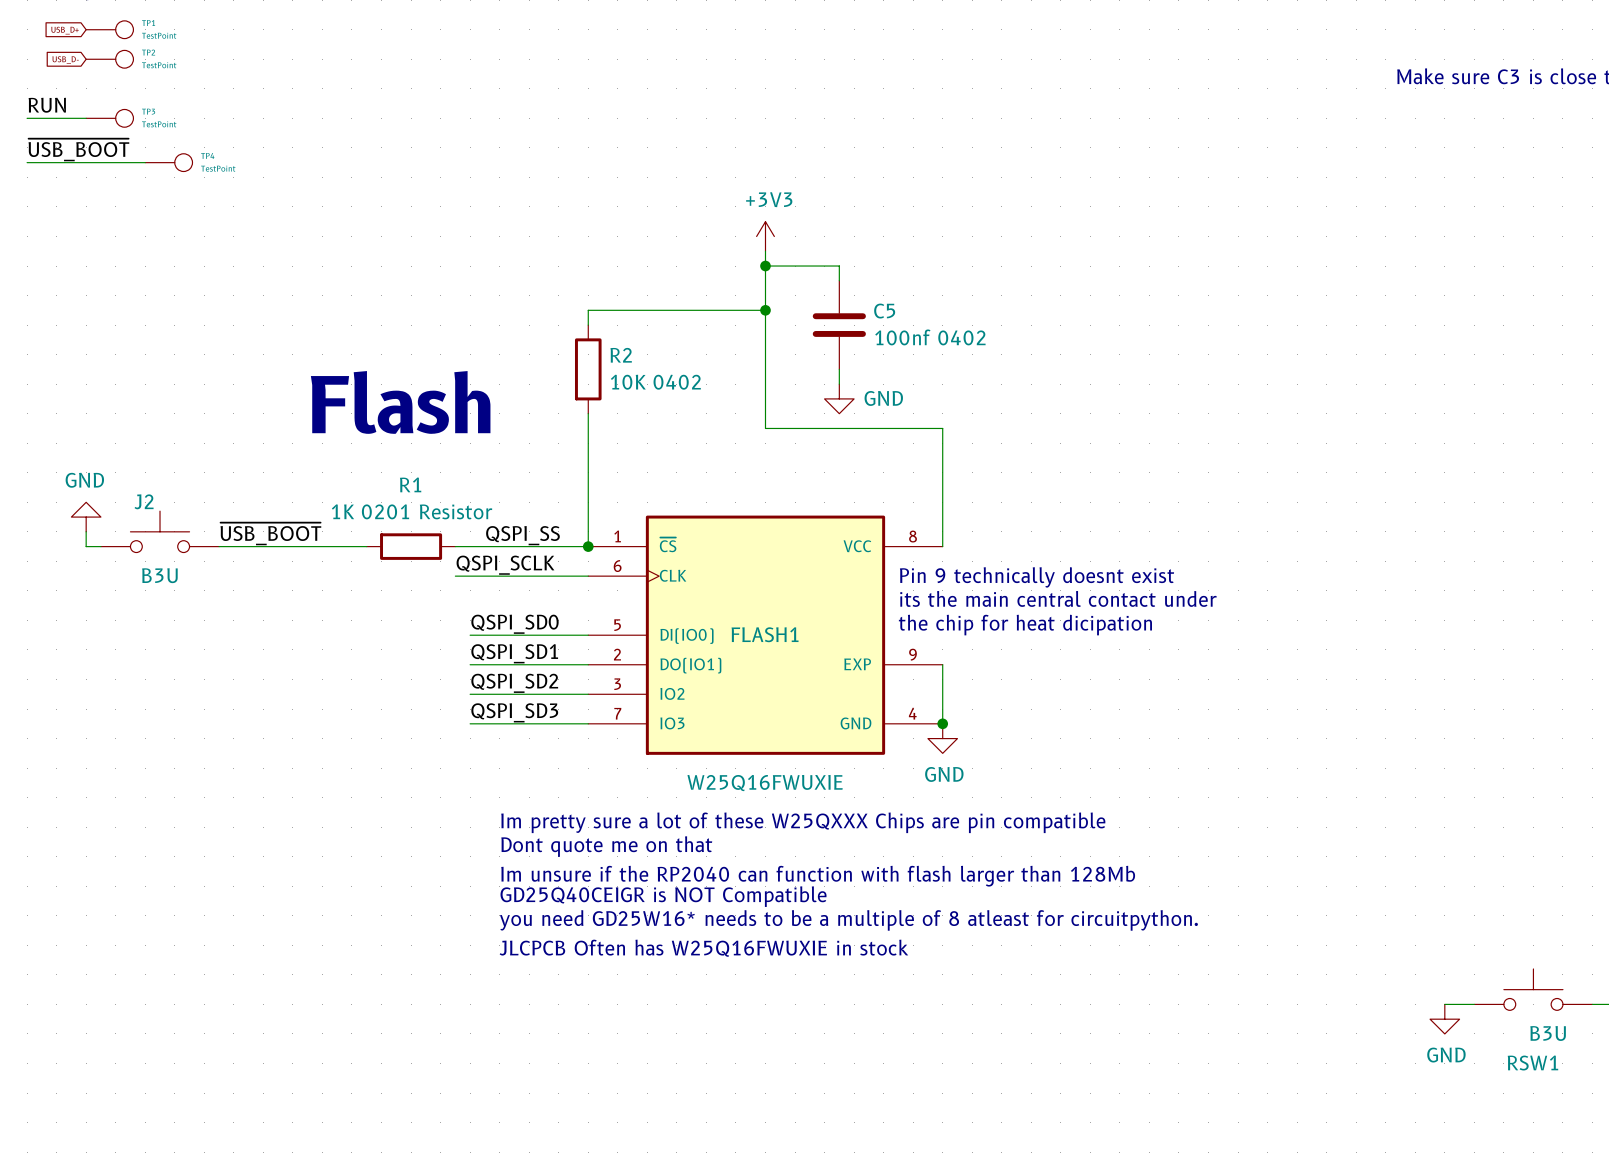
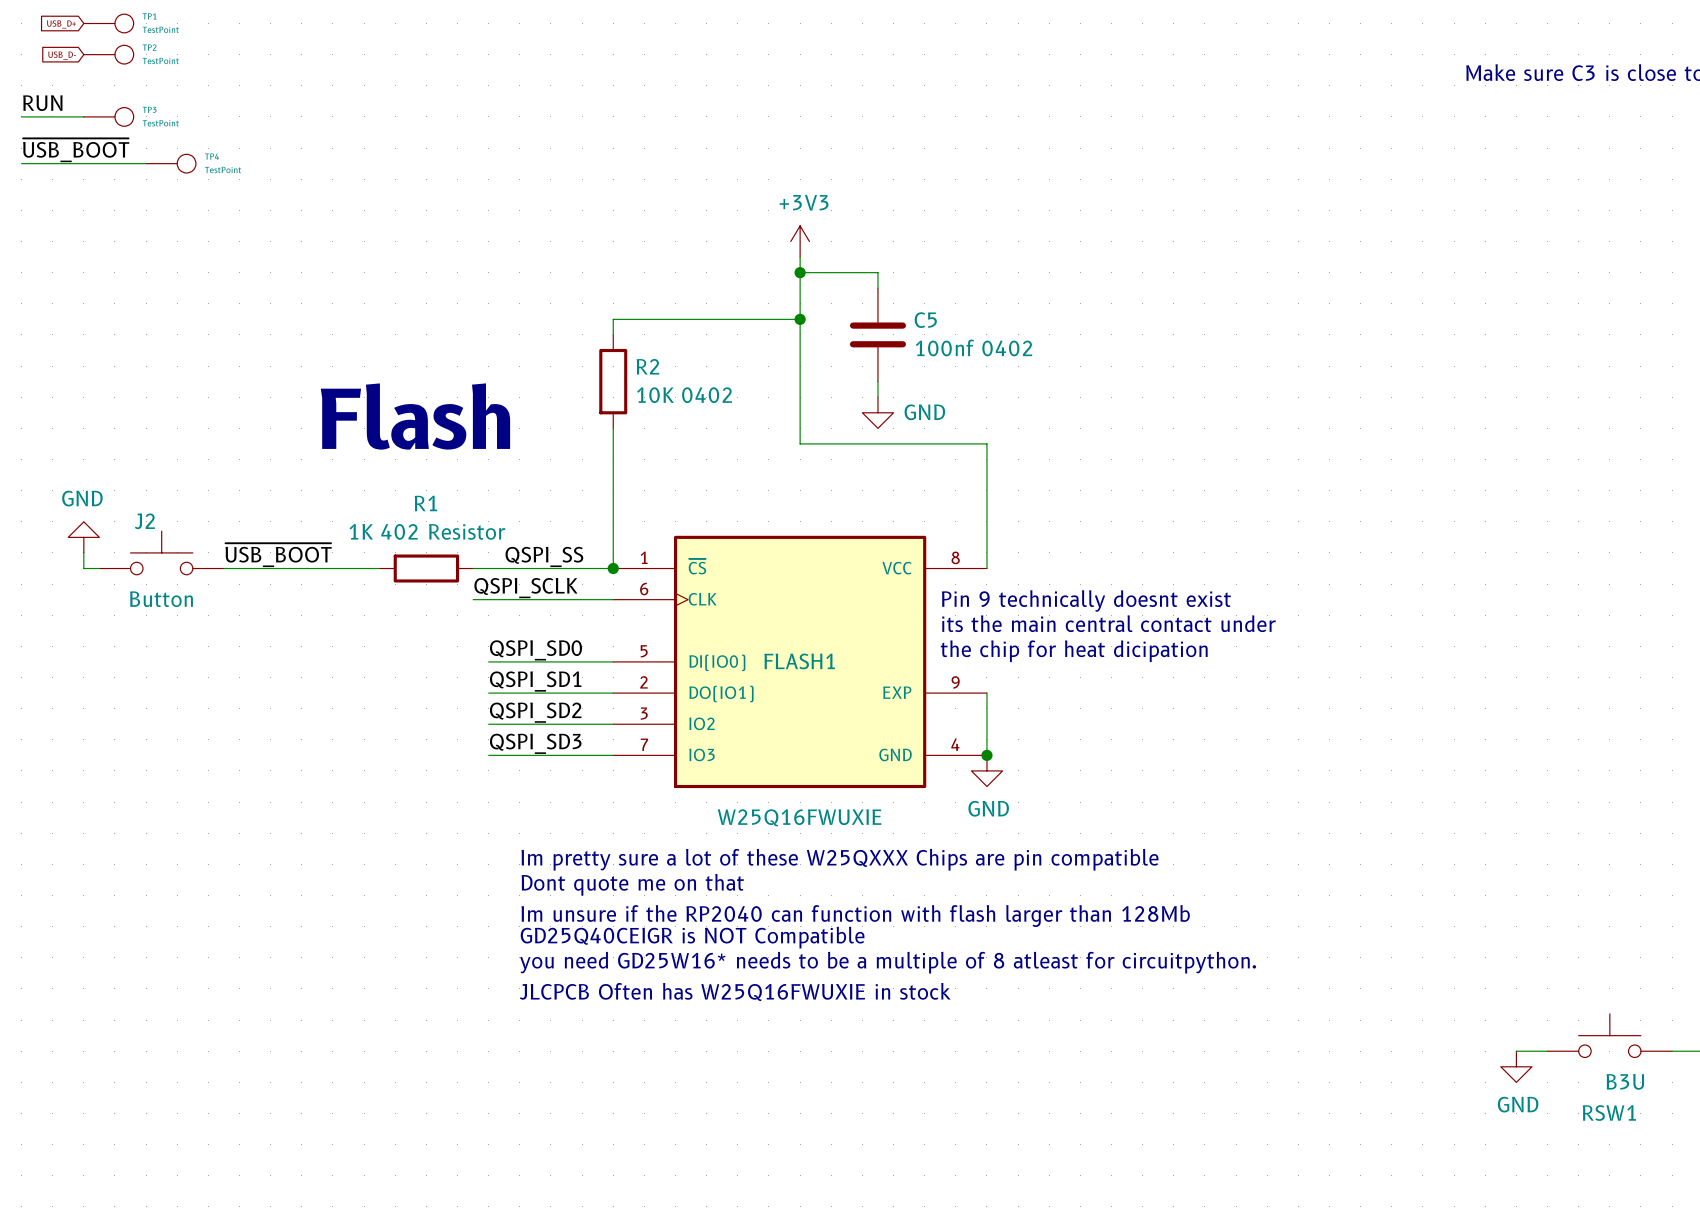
R1 value: 1K 0201 Resistor (412, 511) -> 1K 402 Resistor (427, 531)
J2 value: B3U (159, 575) -> Button (161, 599)

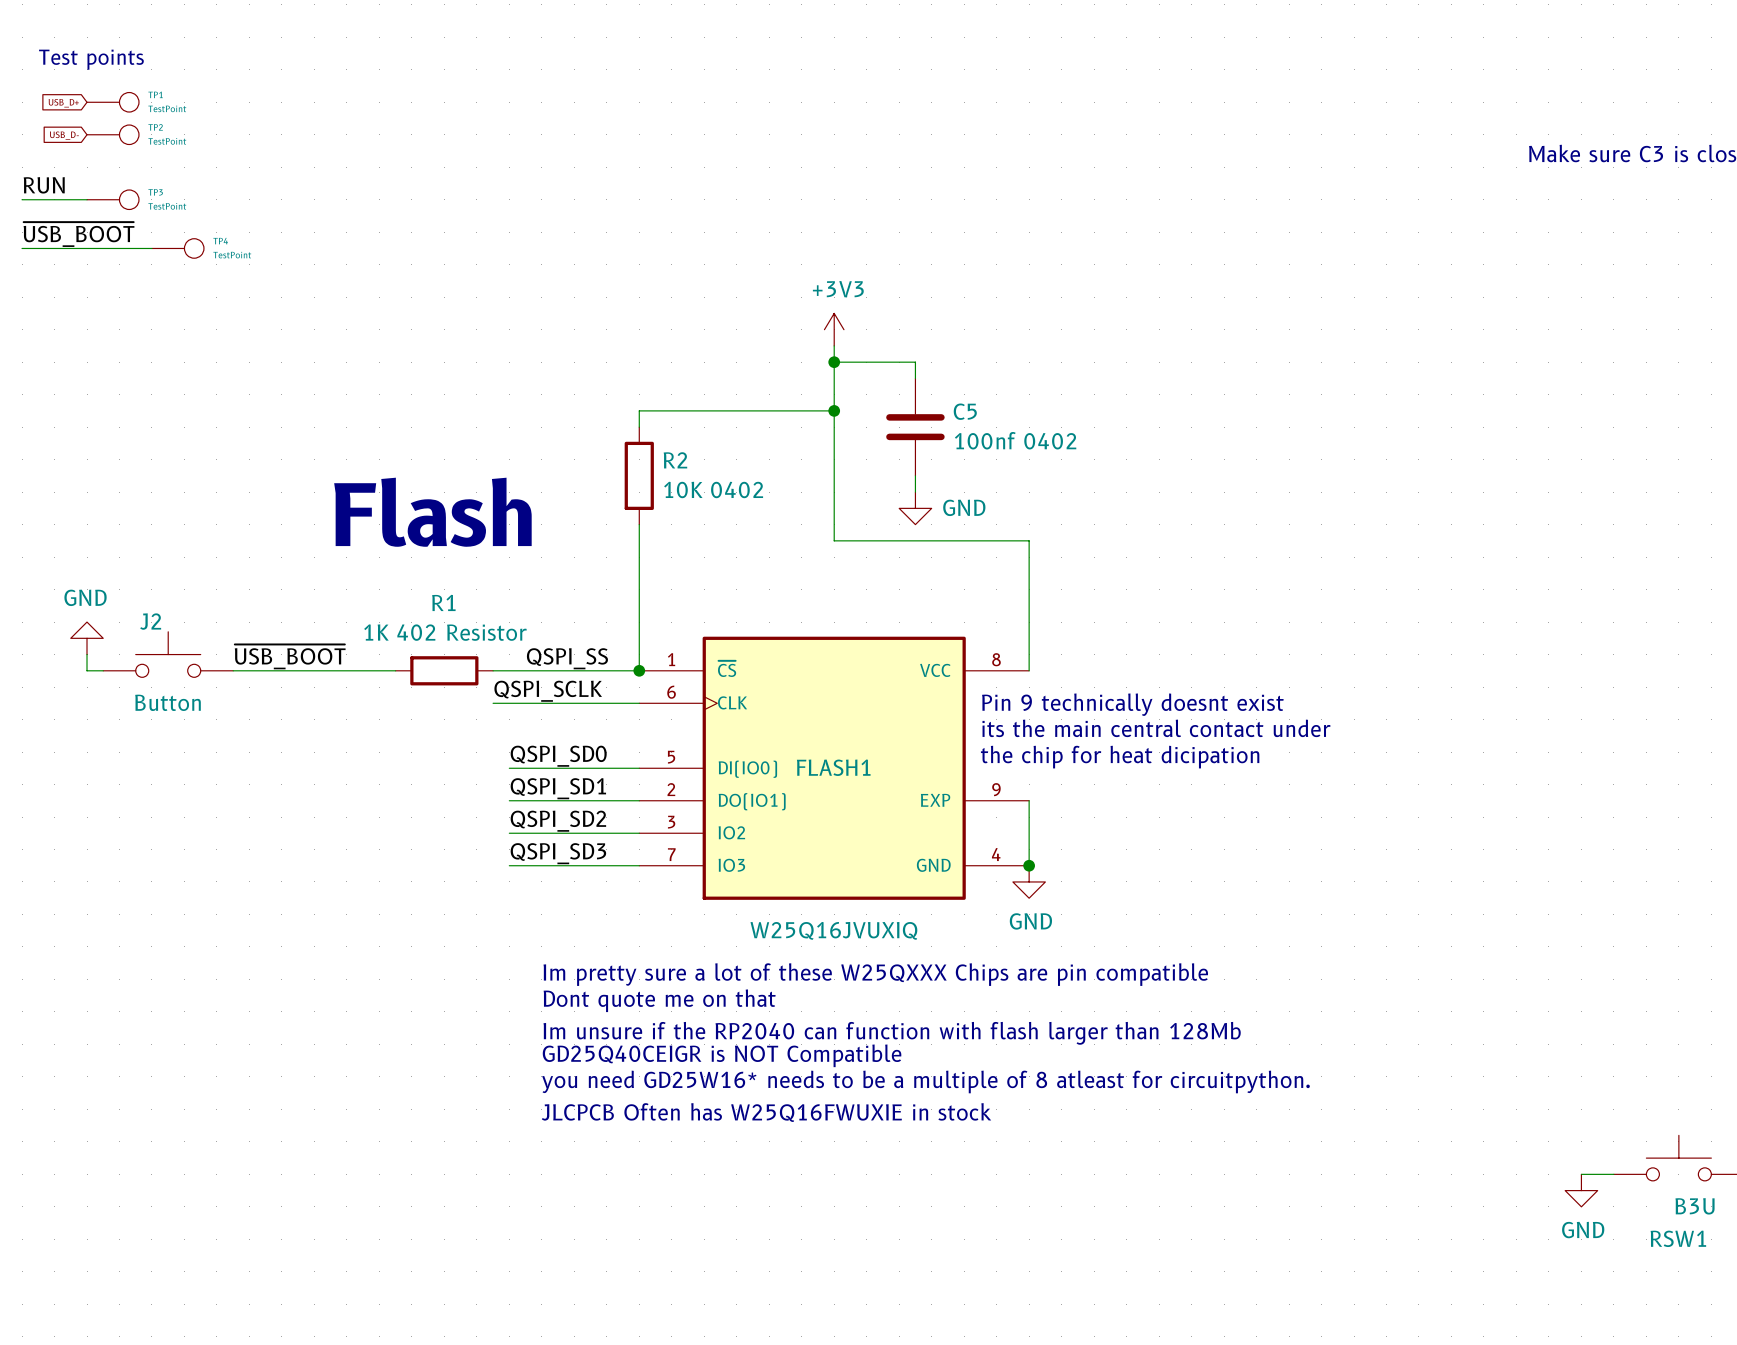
FLASH1 value: W25Q16FWUXIE (799, 817) -> W25Q16JVUXIQ (833, 930)

